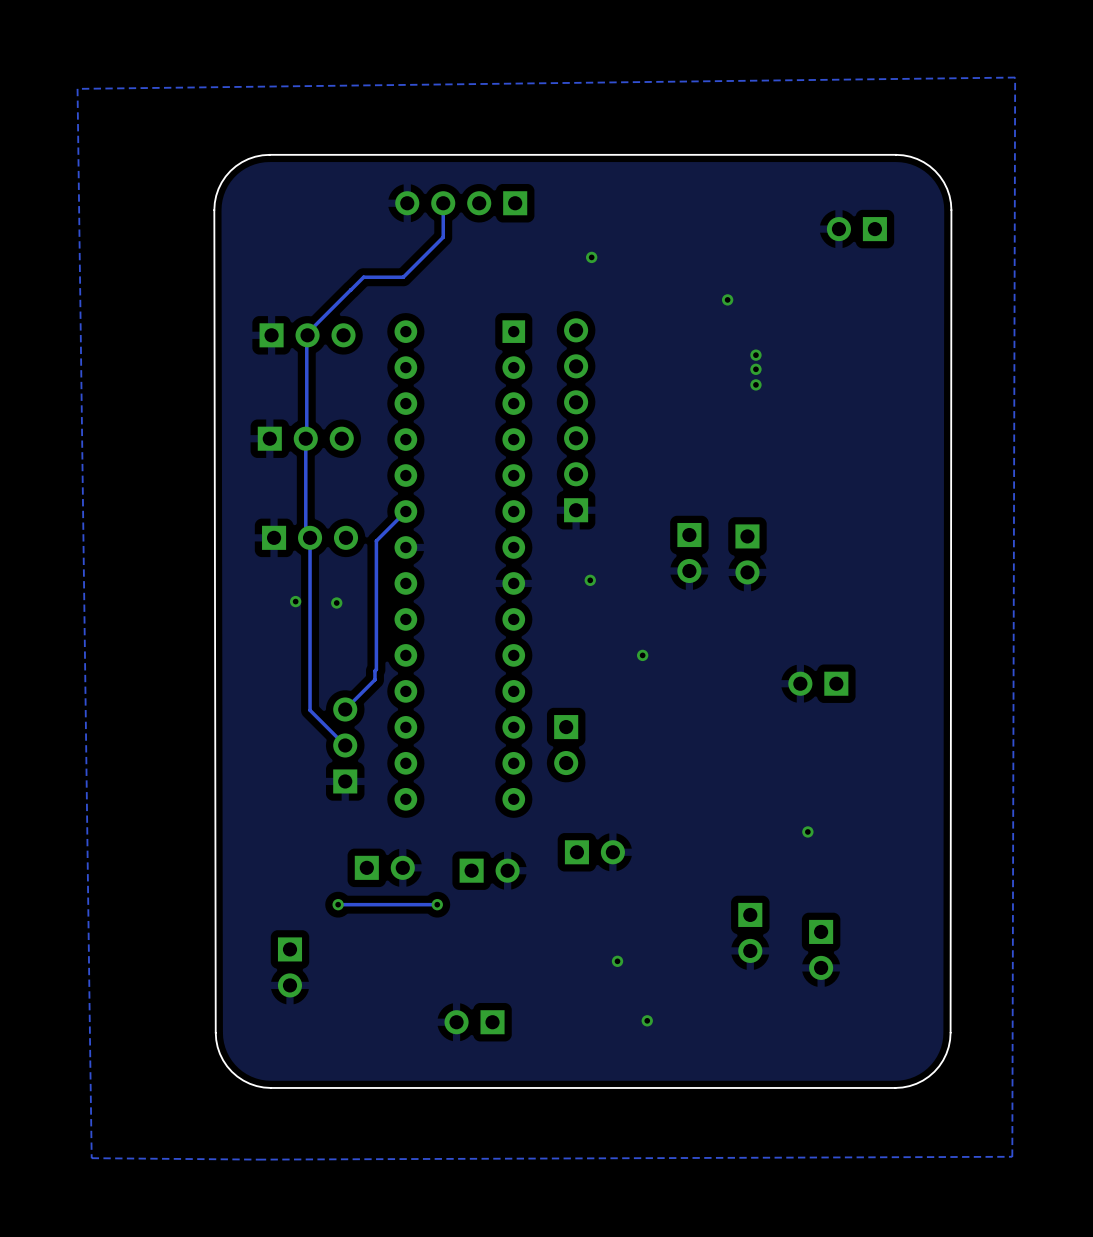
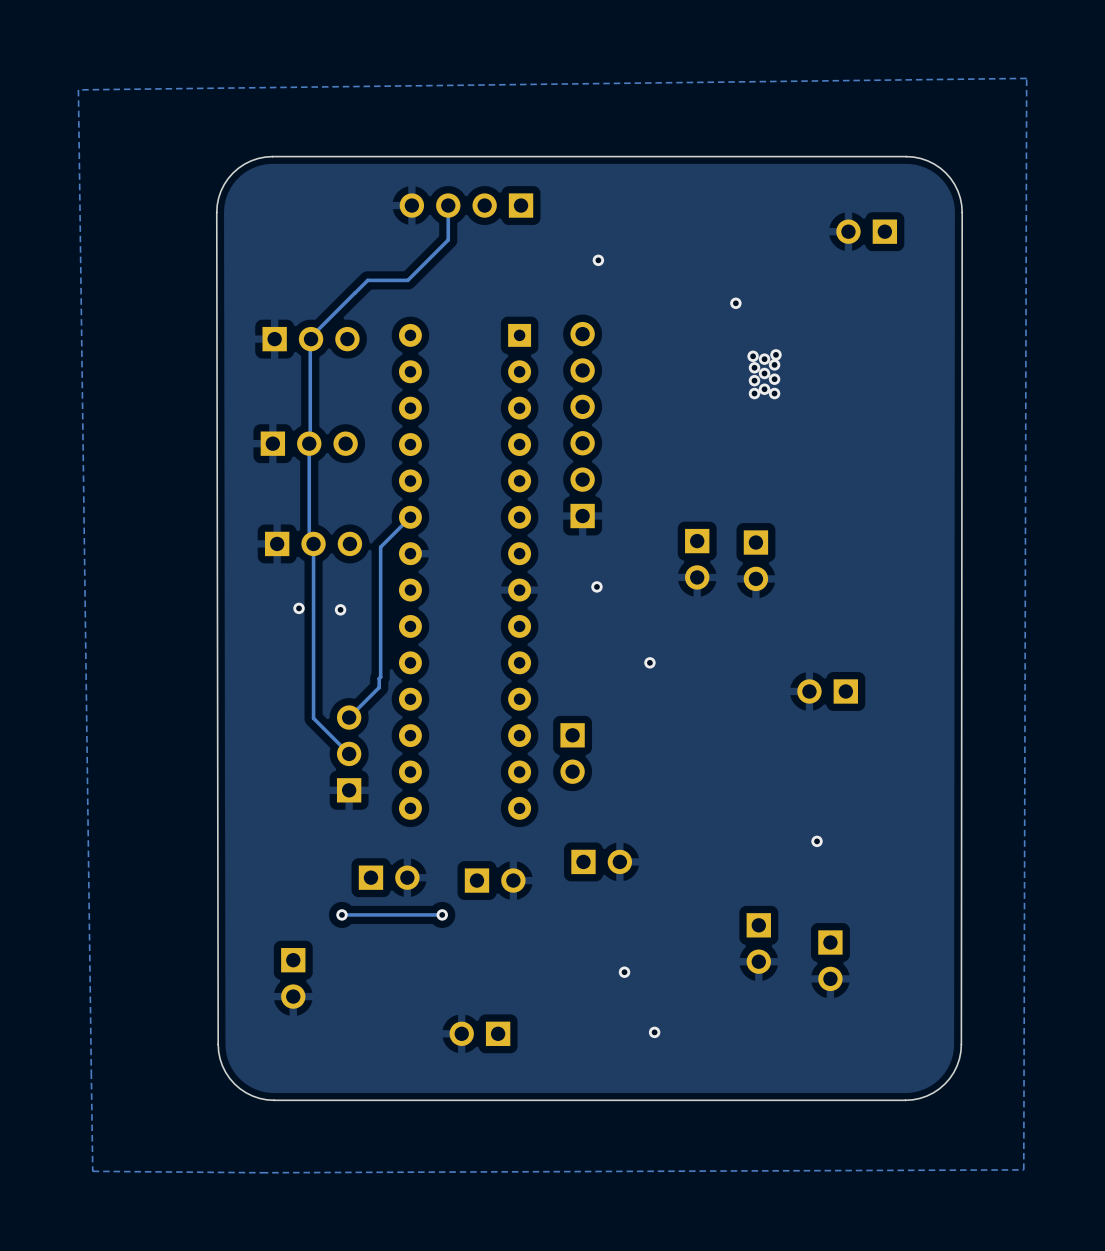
via: none -> (775, 354)
via: none -> (753, 356)
via: none -> (774, 364)
via: none -> (754, 367)
via: none -> (774, 379)
via: none -> (754, 380)
via: none -> (754, 393)
via: none -> (774, 393)

